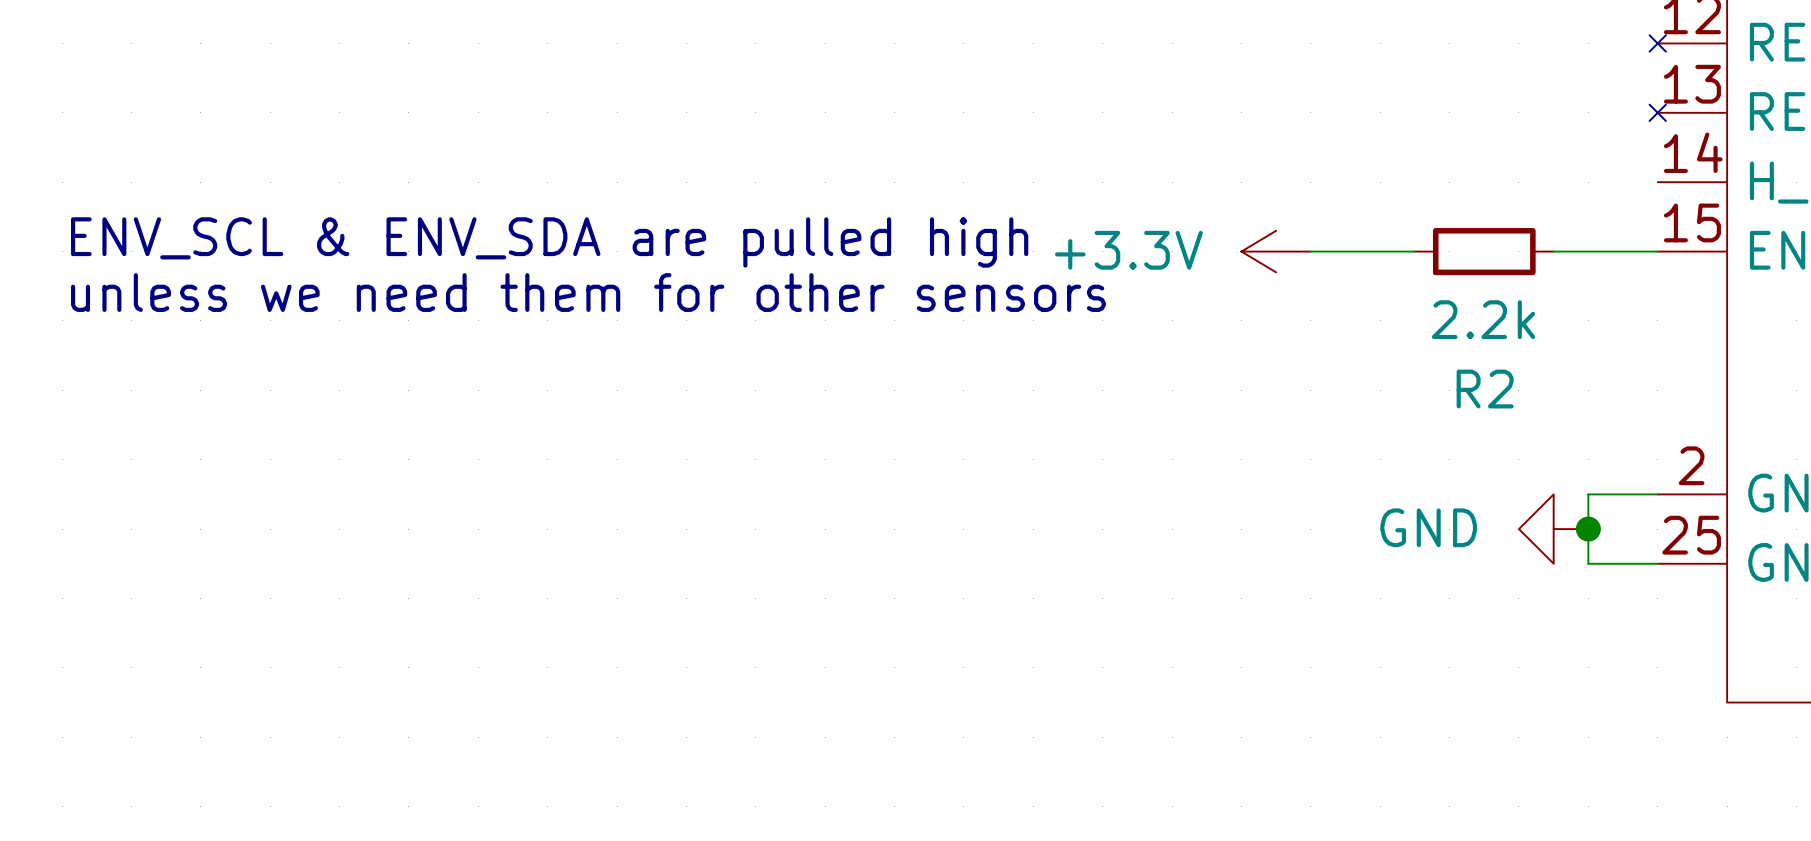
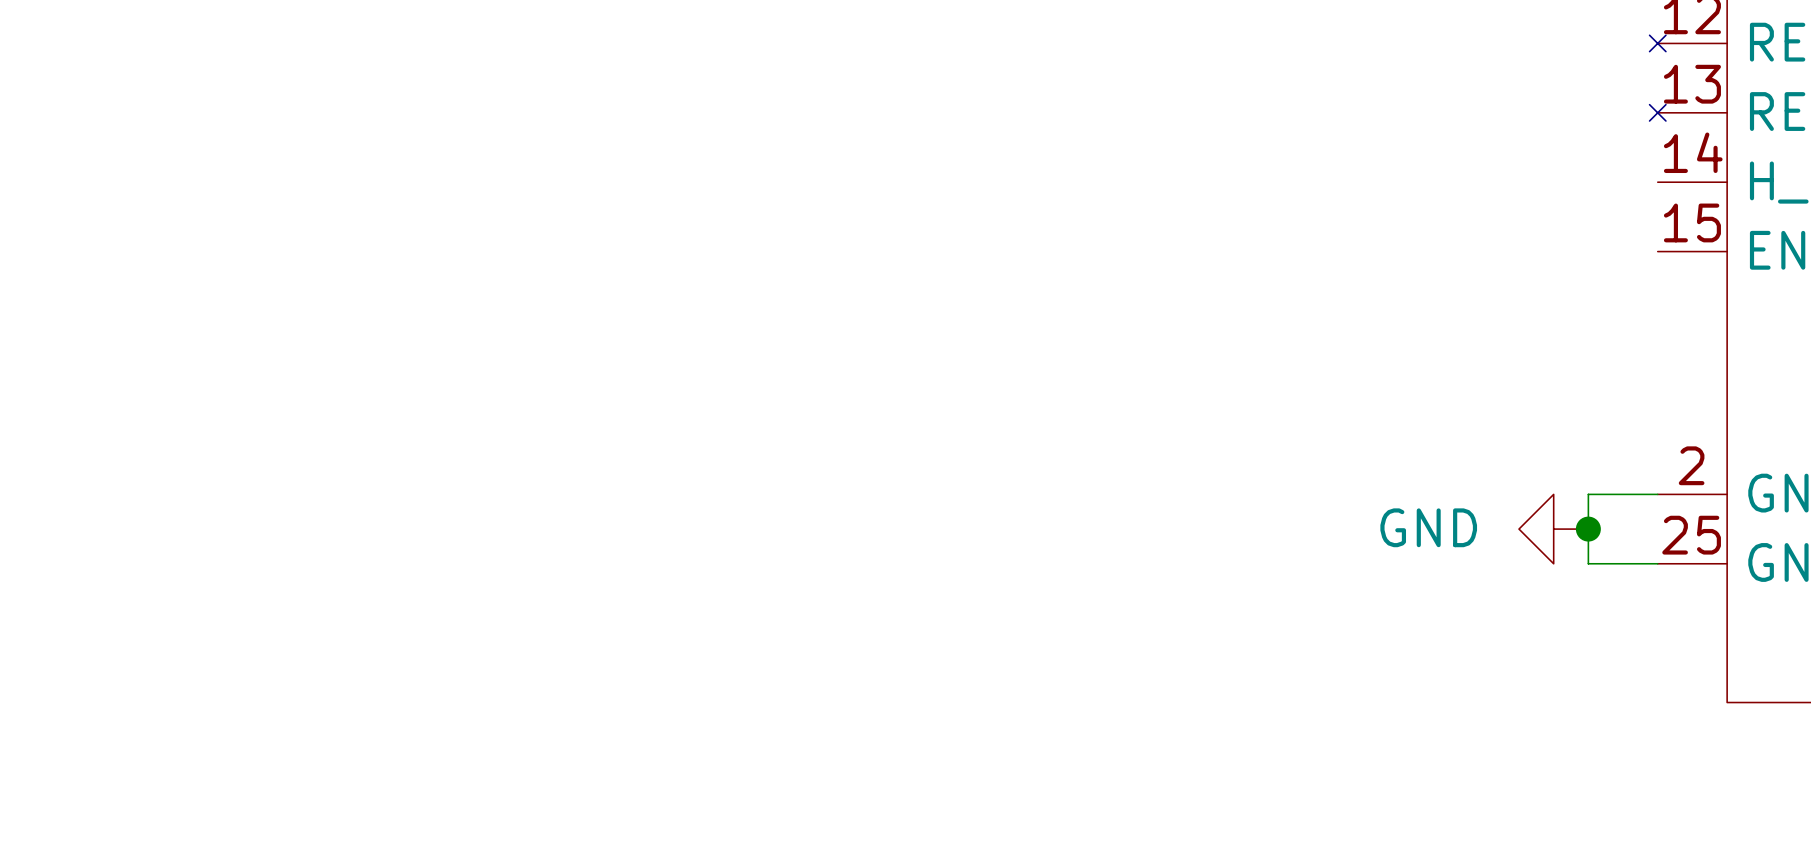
text: ENV_SCL & ENV_SDA are pulled high (549, 242) -> none
power symbol: +3.3V (1276, 251) -> none
wire: (1310, 251) (1414, 251) -> none
R2: 2.2k (1484, 251) -> none
wire: (1553, 251) (1657, 251) -> none
text: unless we need them for other sensors (588, 292) -> none

